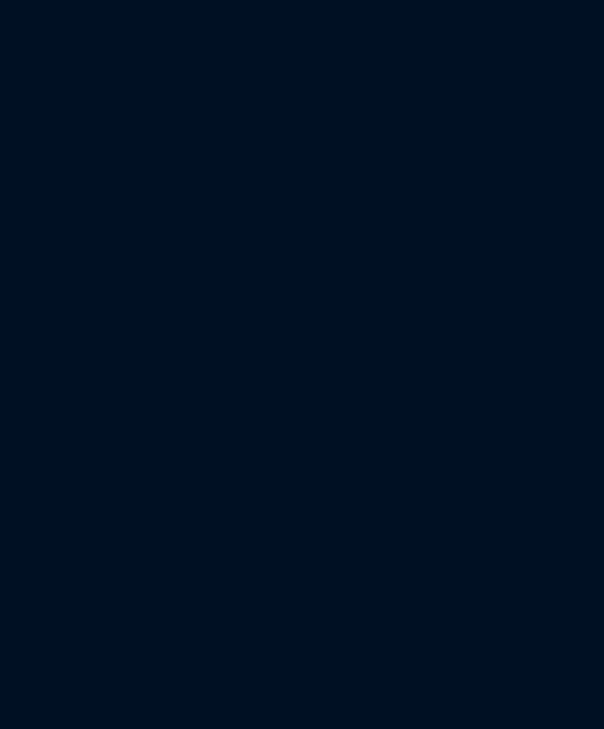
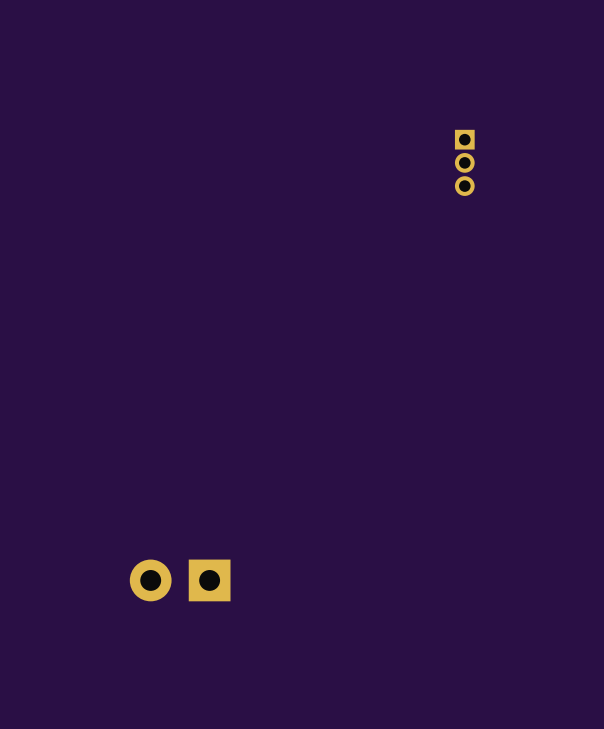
part: none -> (464, 162)
part: none -> (180, 580)

